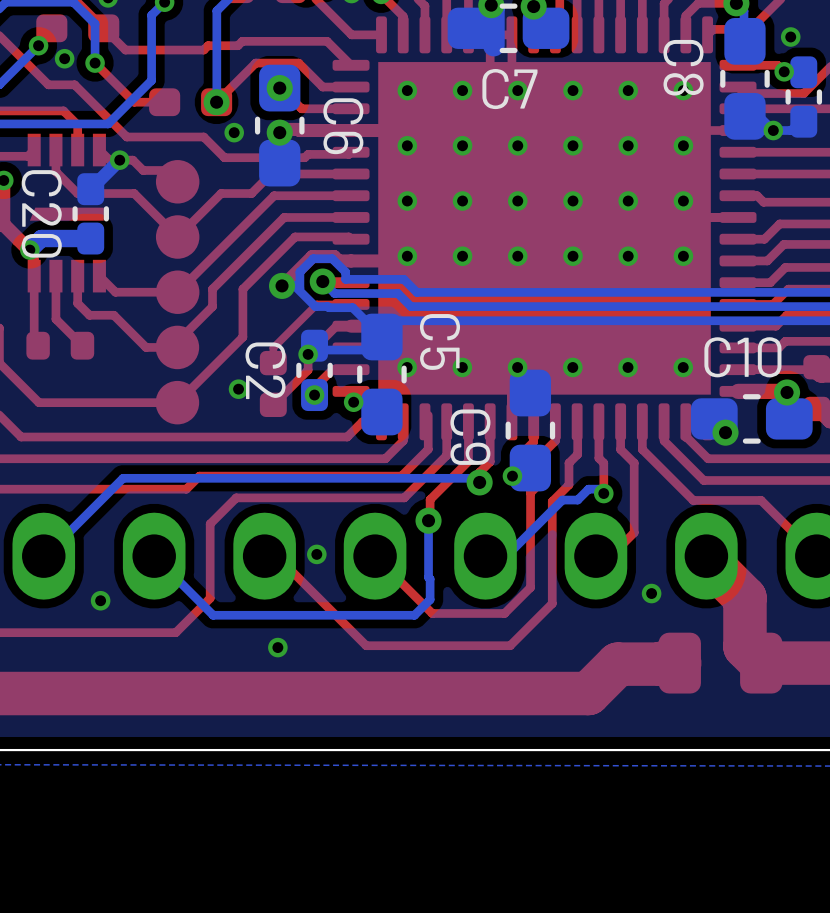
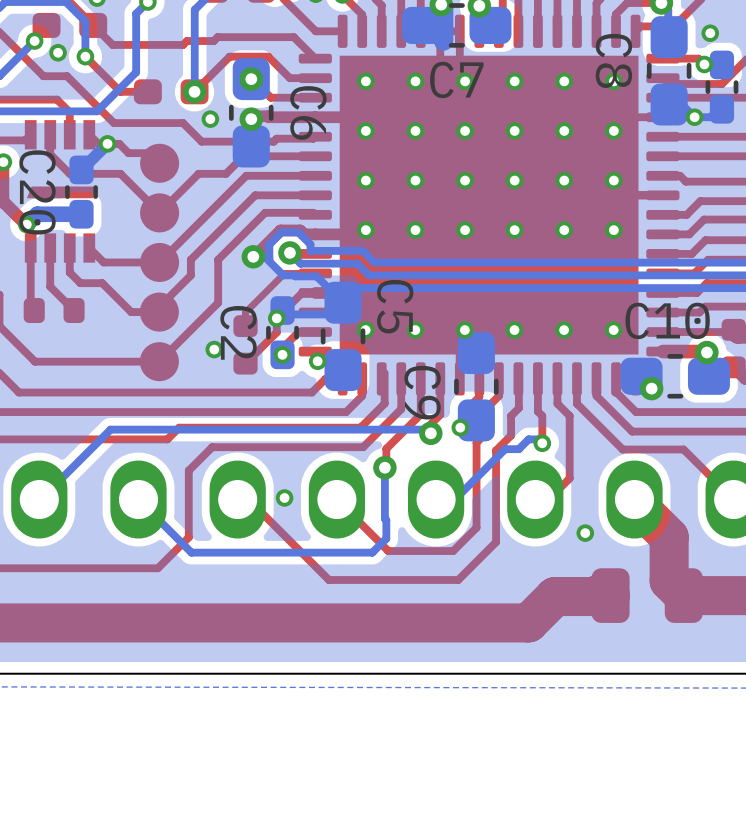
via: (100, 600) -> none
via: (277, 647) -> none

